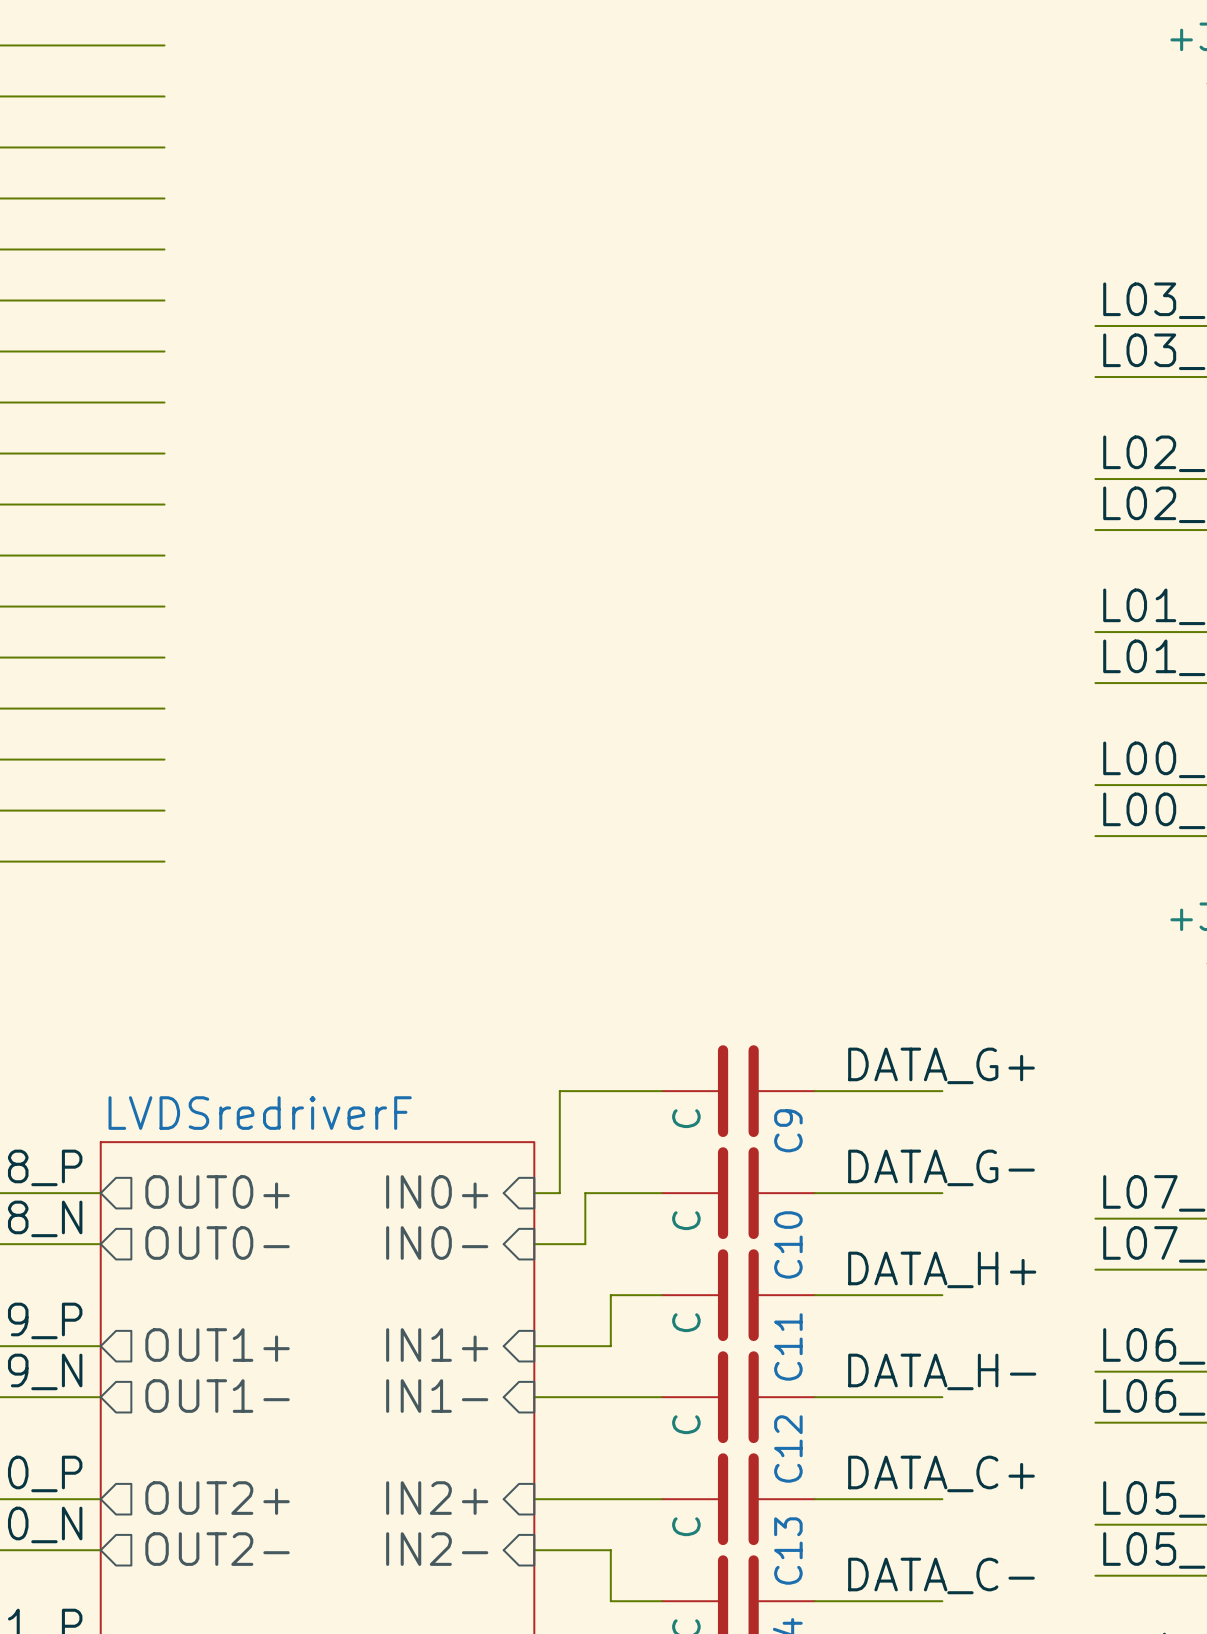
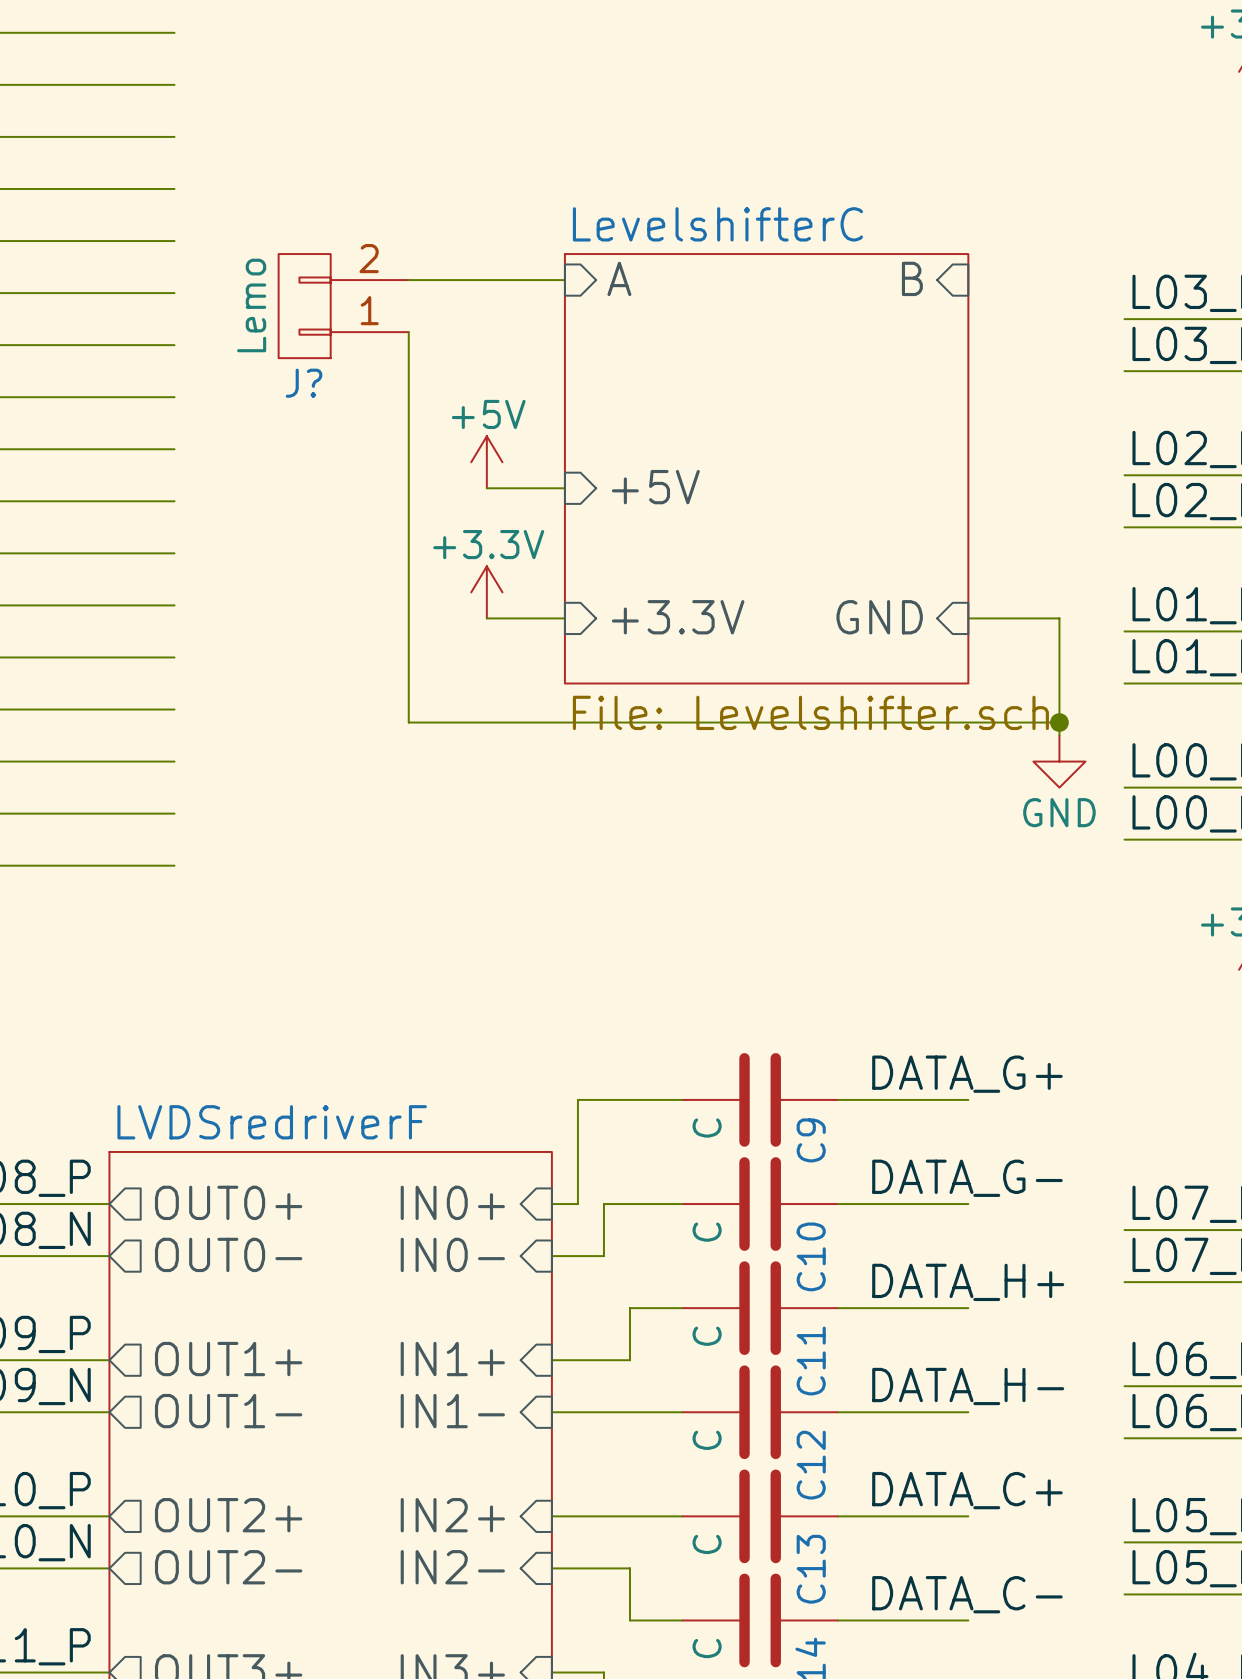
sheet pin: none -> A (619, 278)
sheet pin: none -> B (912, 278)
wire: none -> (408, 280) (564, 280)
J?: none -> Lemo (343, 306)
wire: none -> (408, 332) (408, 722) (1059, 722)
power symbol: none -> +5V (486, 462)
sheet LevelshifterC: none -> File: Levelshifter.sch (766, 468)
sheet pin: none -> +5V (655, 487)
wire: none -> (486, 488) (564, 488)
power symbol: none -> +3.3V (486, 592)
sheet pin: none -> +3.3V (678, 617)
sheet pin: none -> GND (879, 617)
wire: none -> (486, 618) (564, 618)
wire: none -> (968, 618) (1059, 618) (1059, 735)
junction: none -> (1059, 722)
power symbol: none -> GND (1059, 761)

